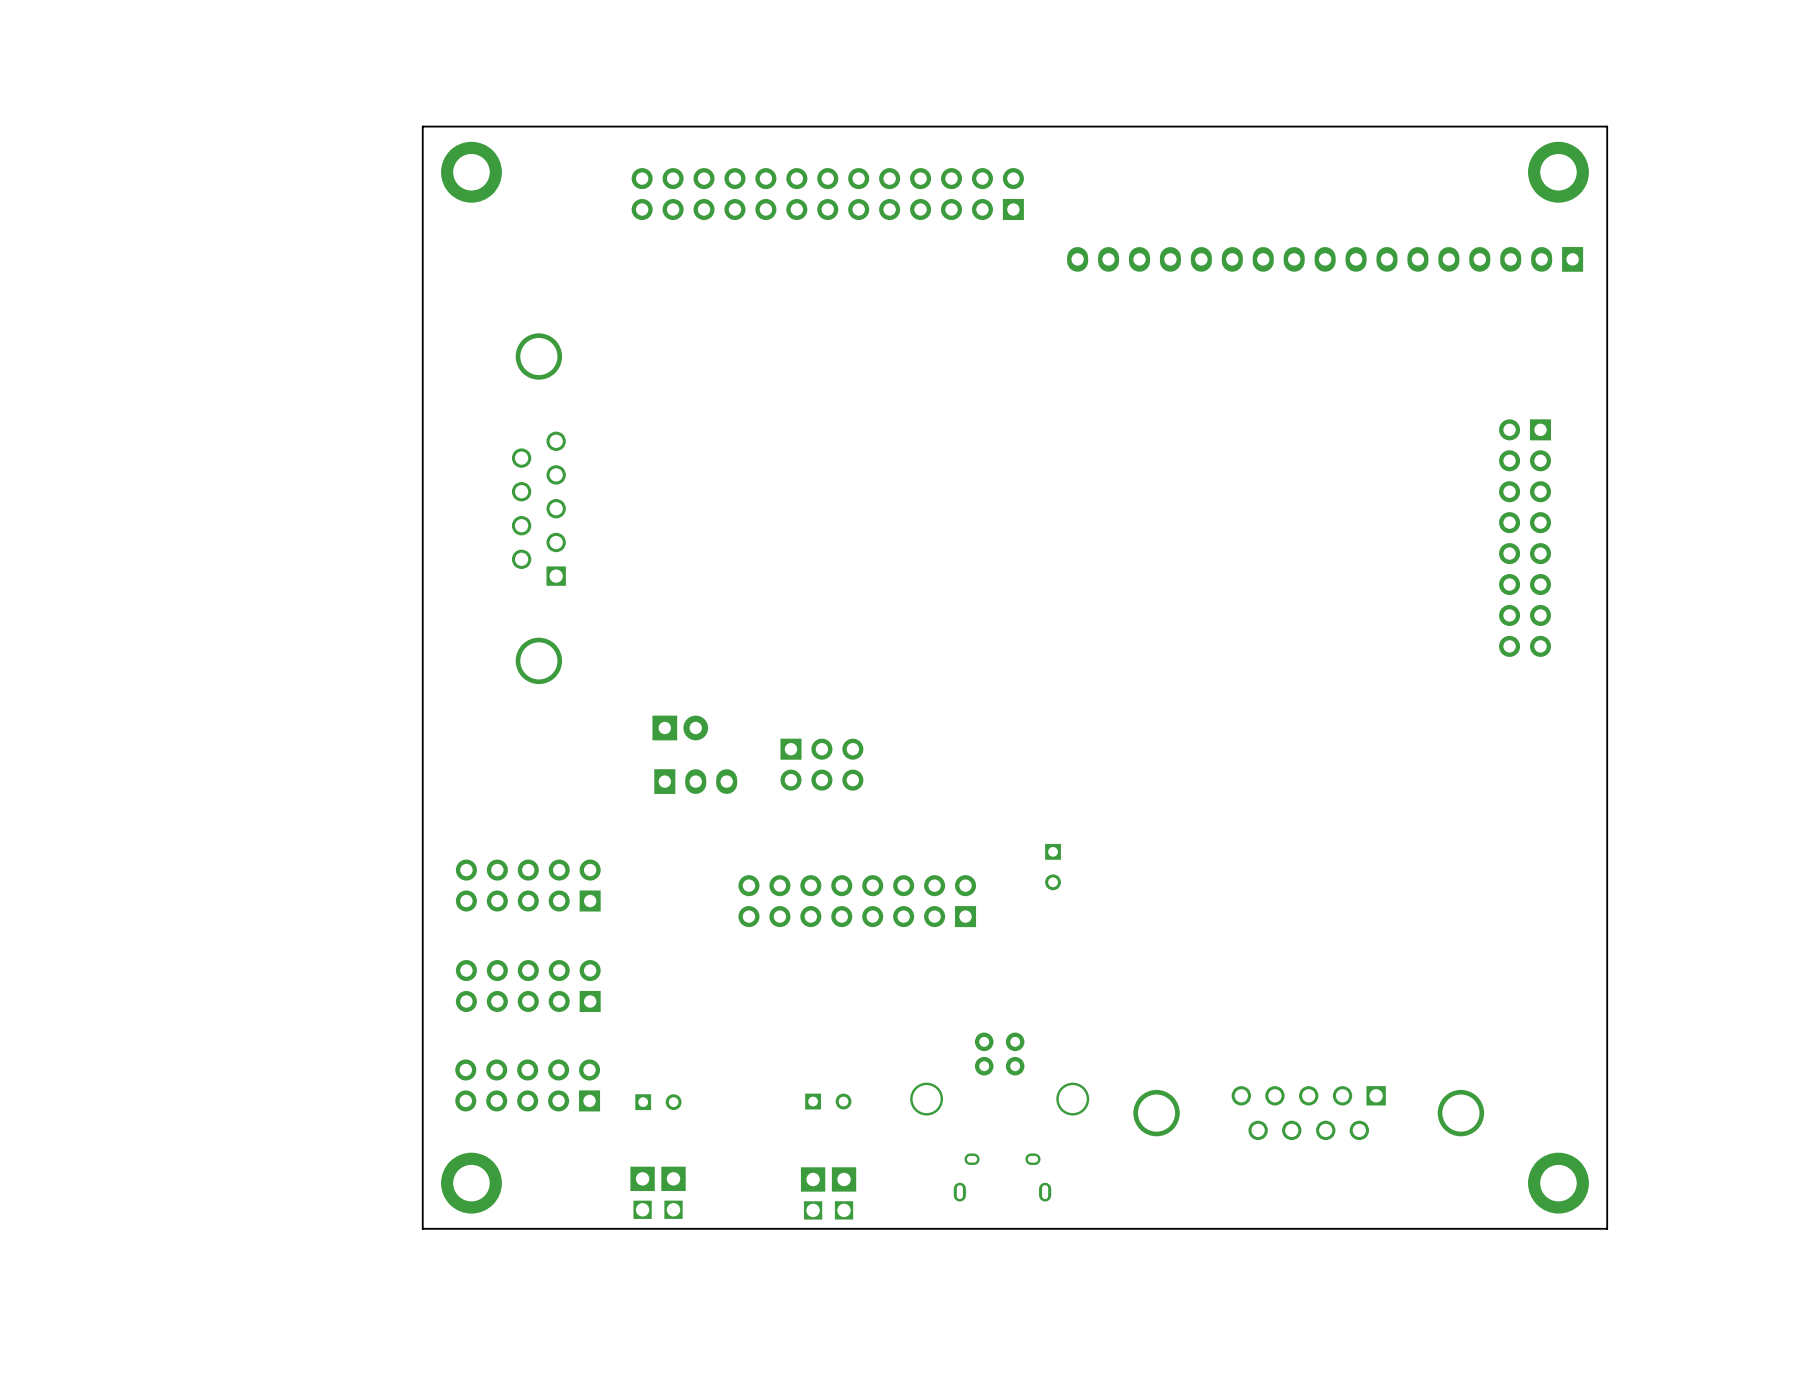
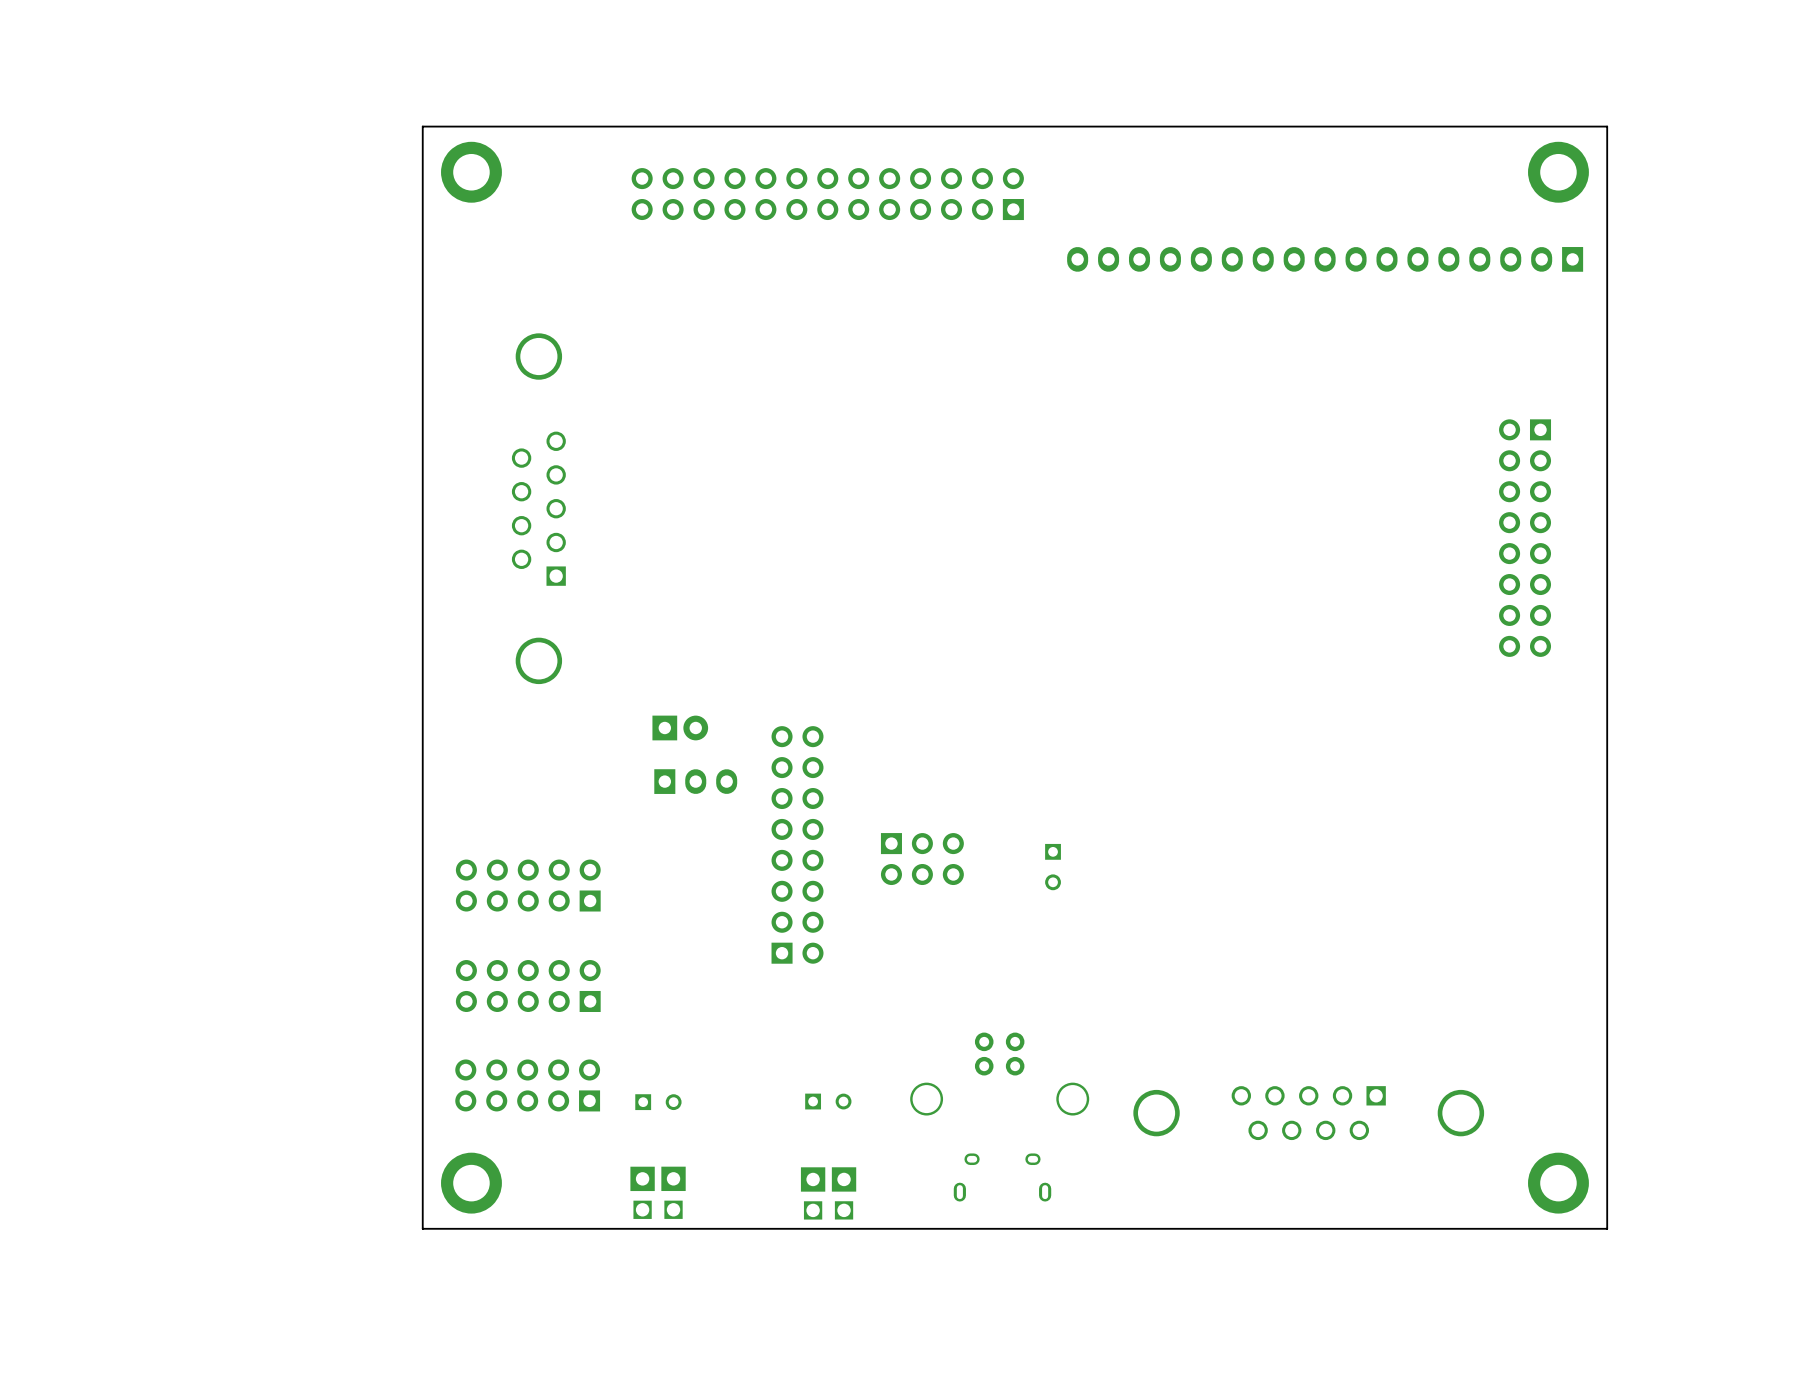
part position: (821, 764) -> (922, 859)
part rotation: 0° (857, 901) -> 90° clockwise (797, 844)

